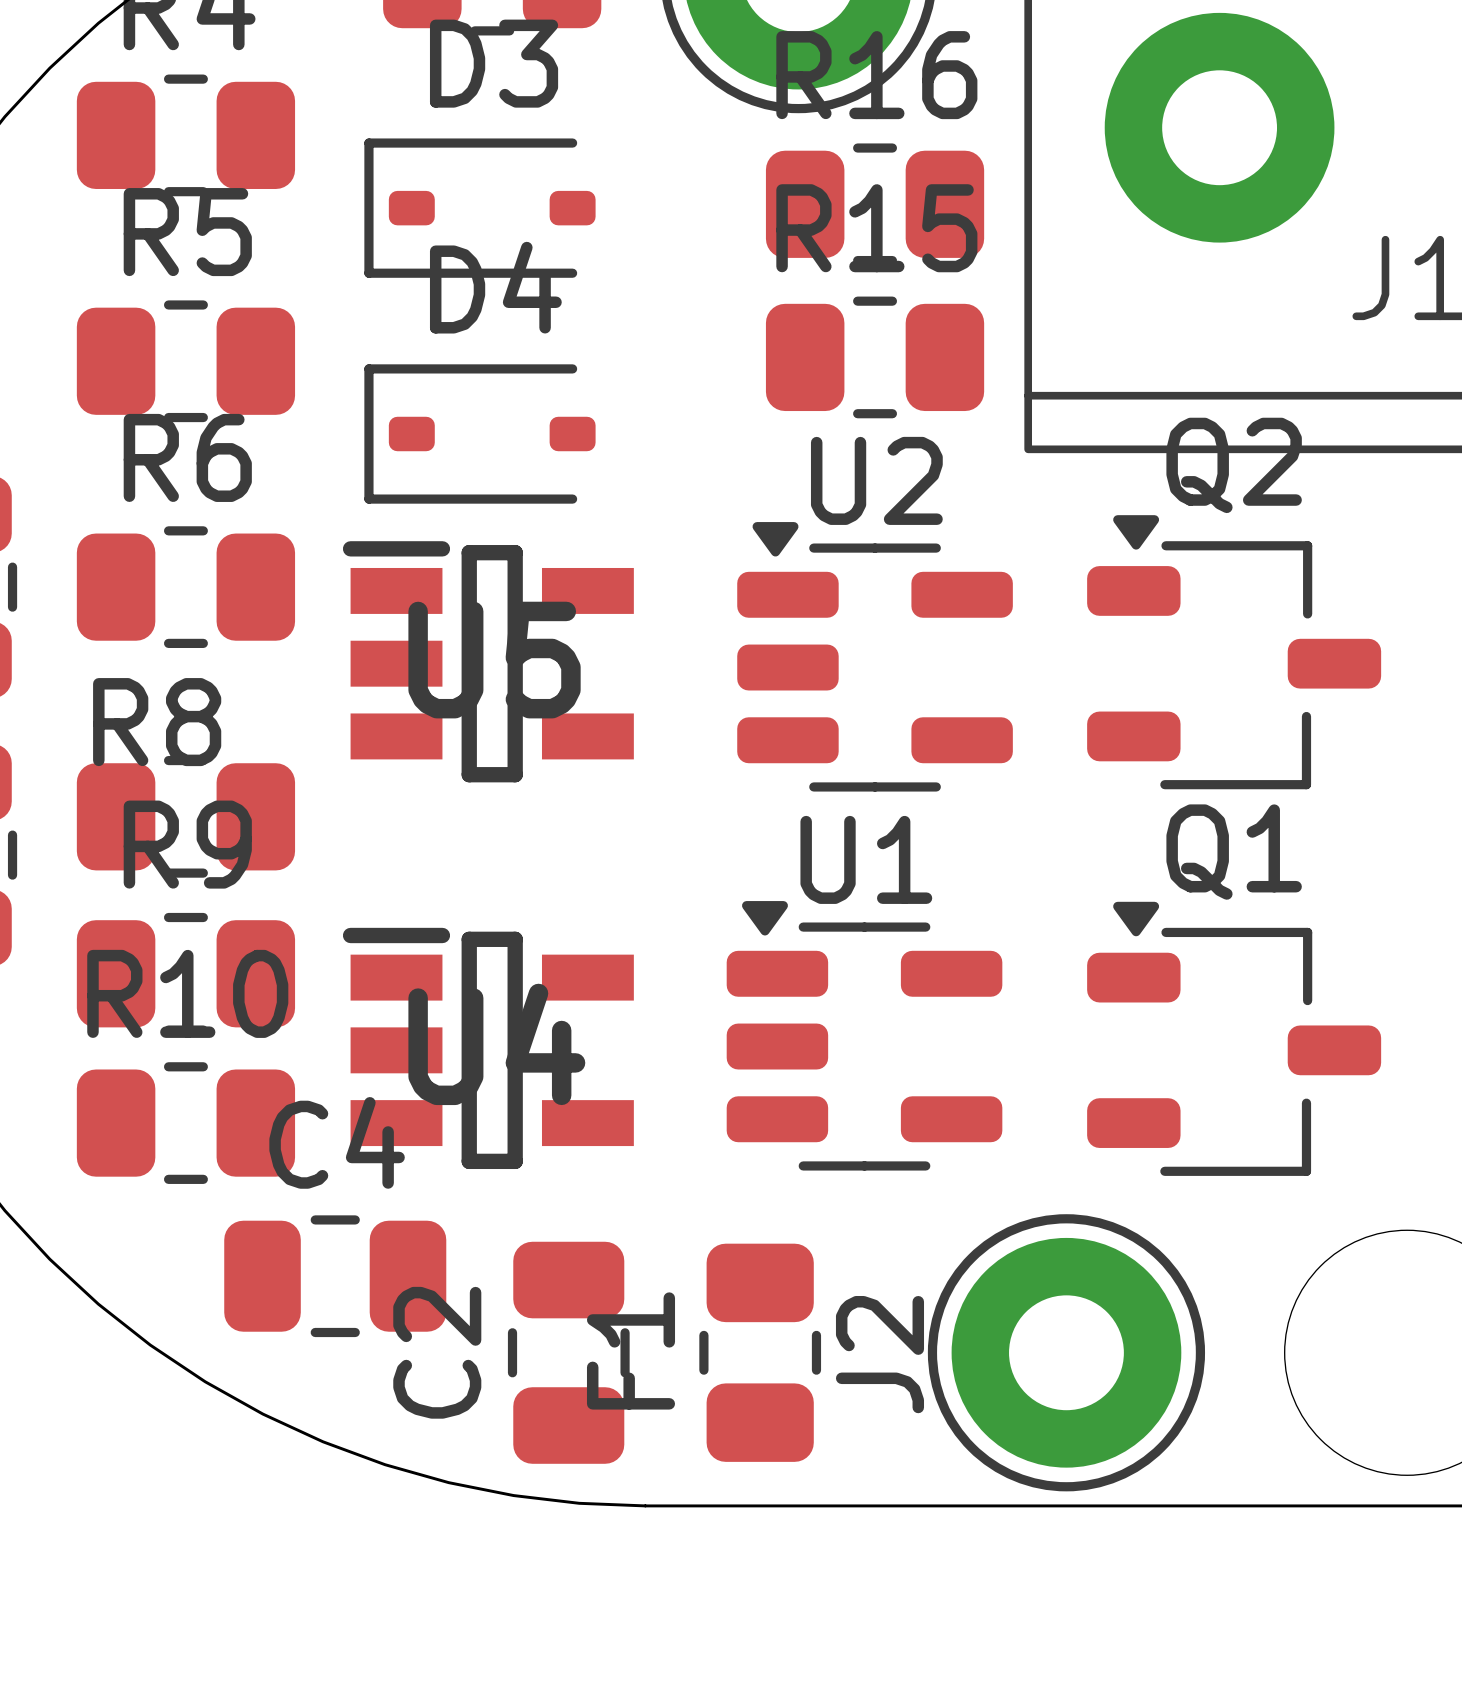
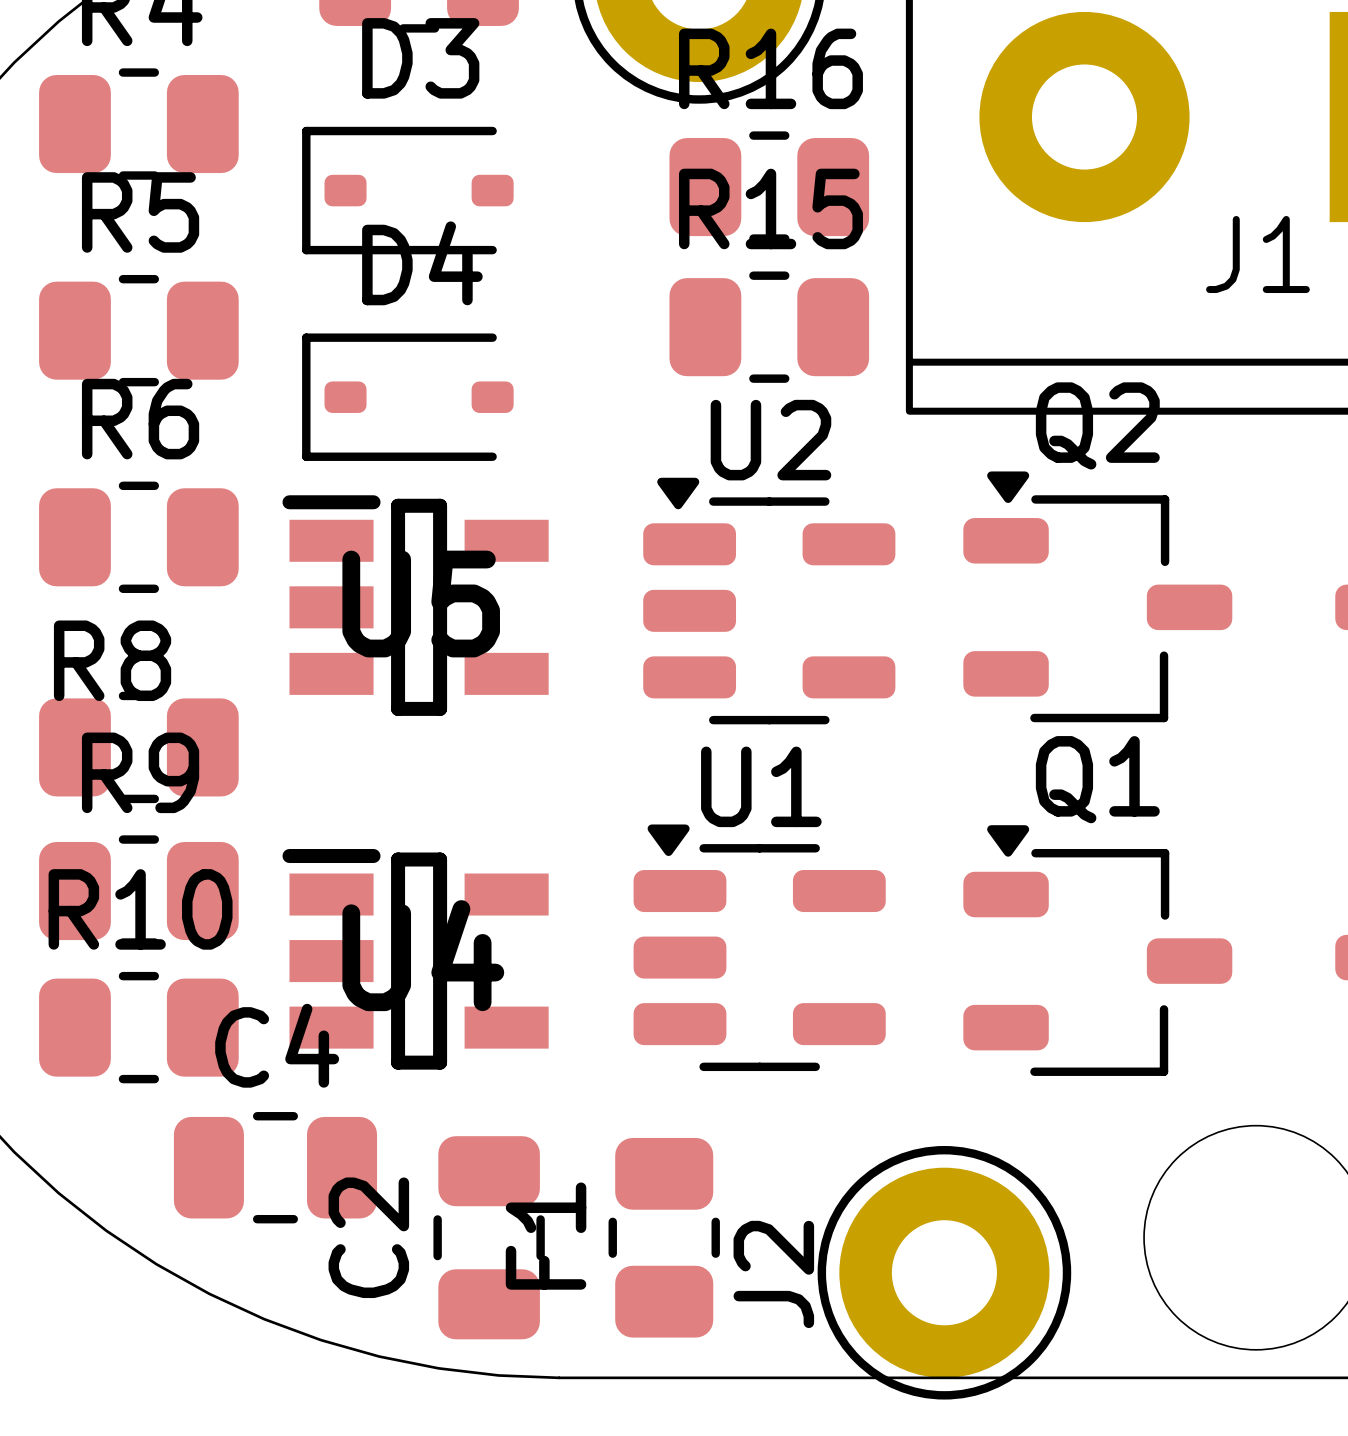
J2 position: (1066, 1352) -> (944, 1272)

